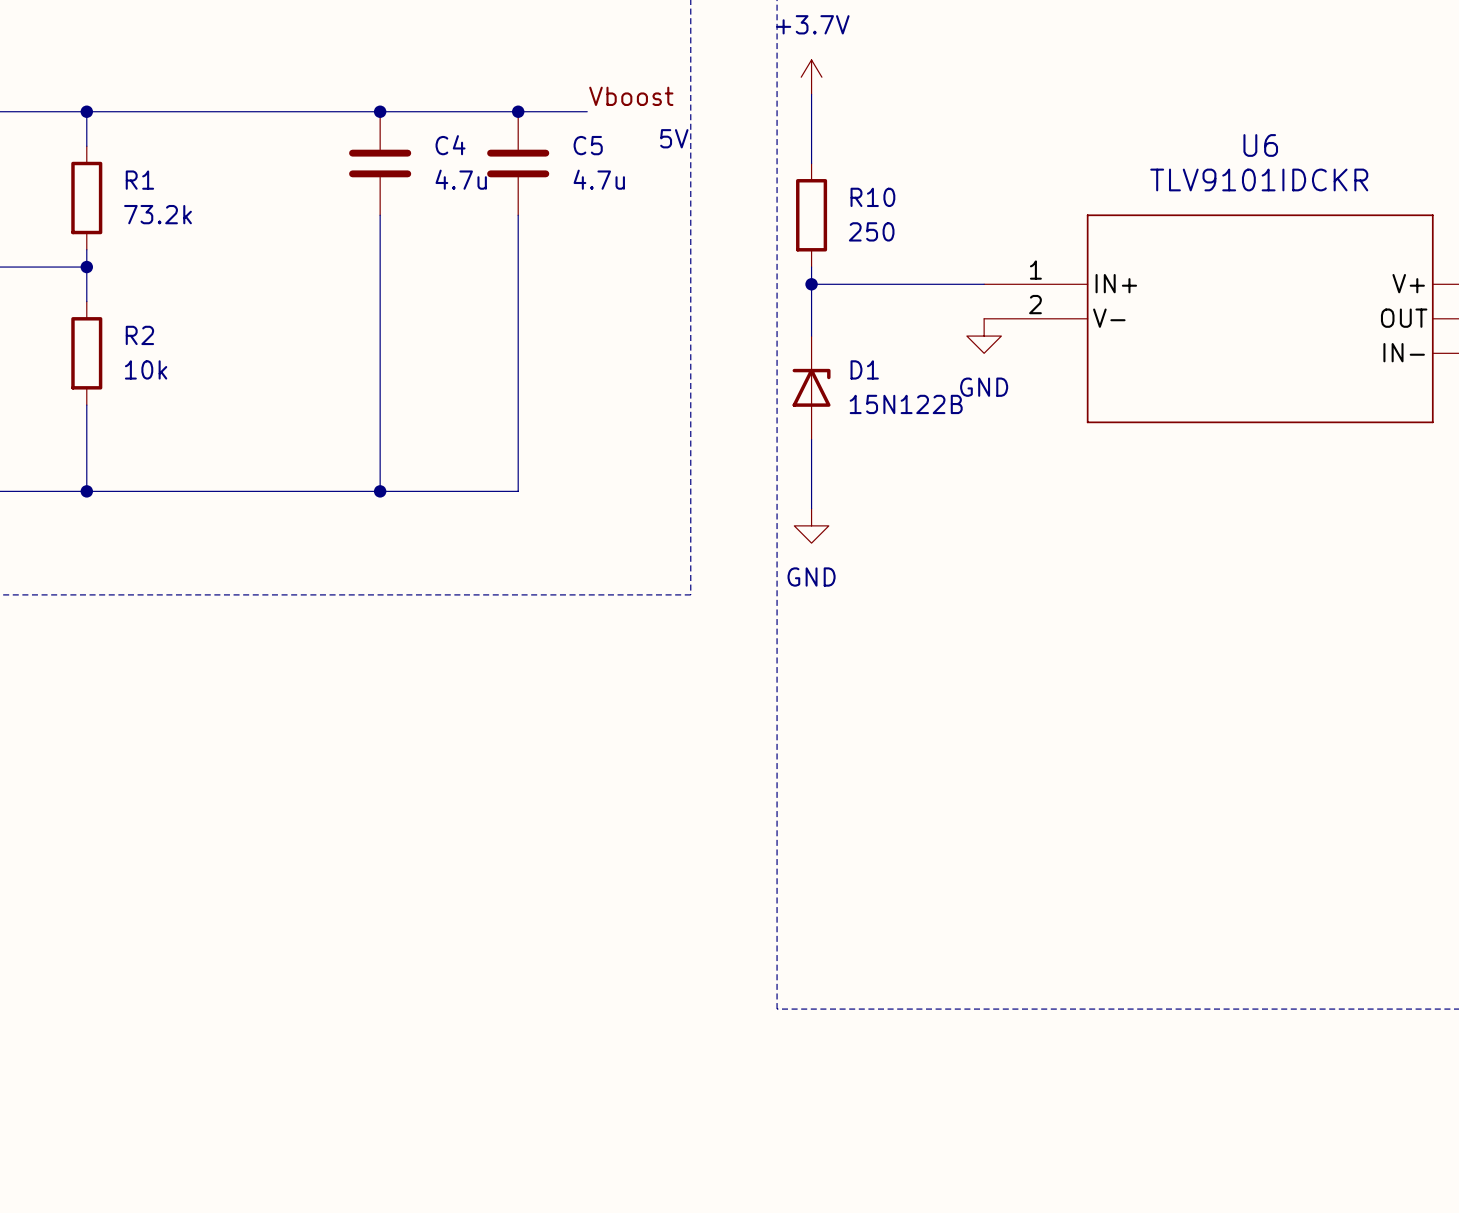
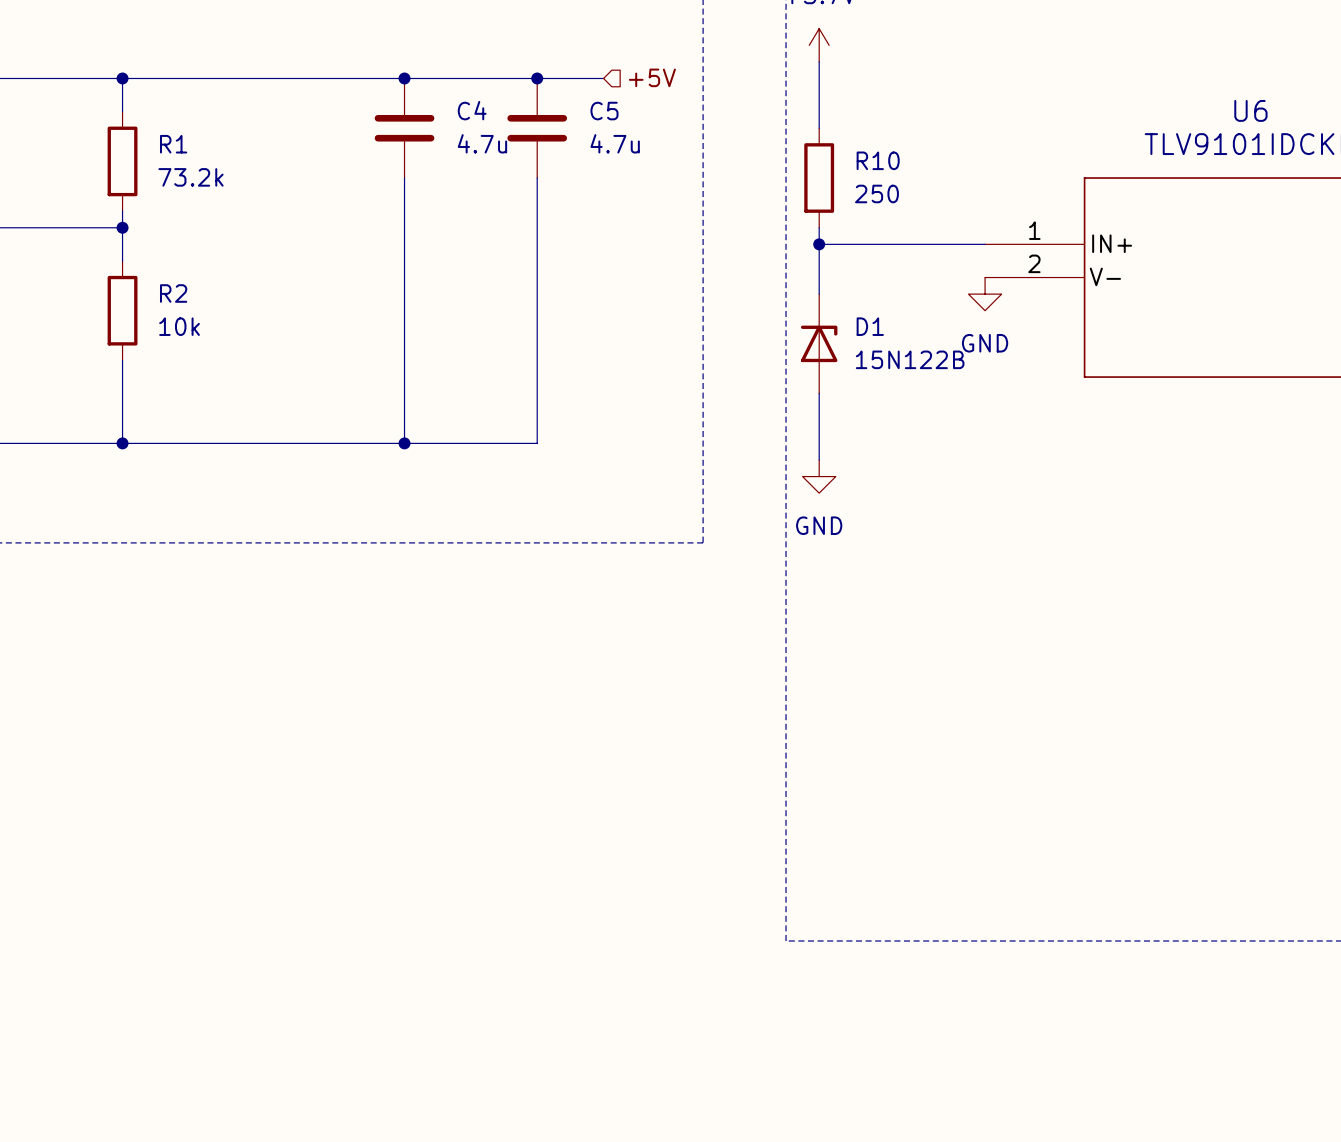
label: Vboost (631, 96) -> none
hierarchical label: none -> +5V (652, 77)
text: 5V (674, 138) -> none

